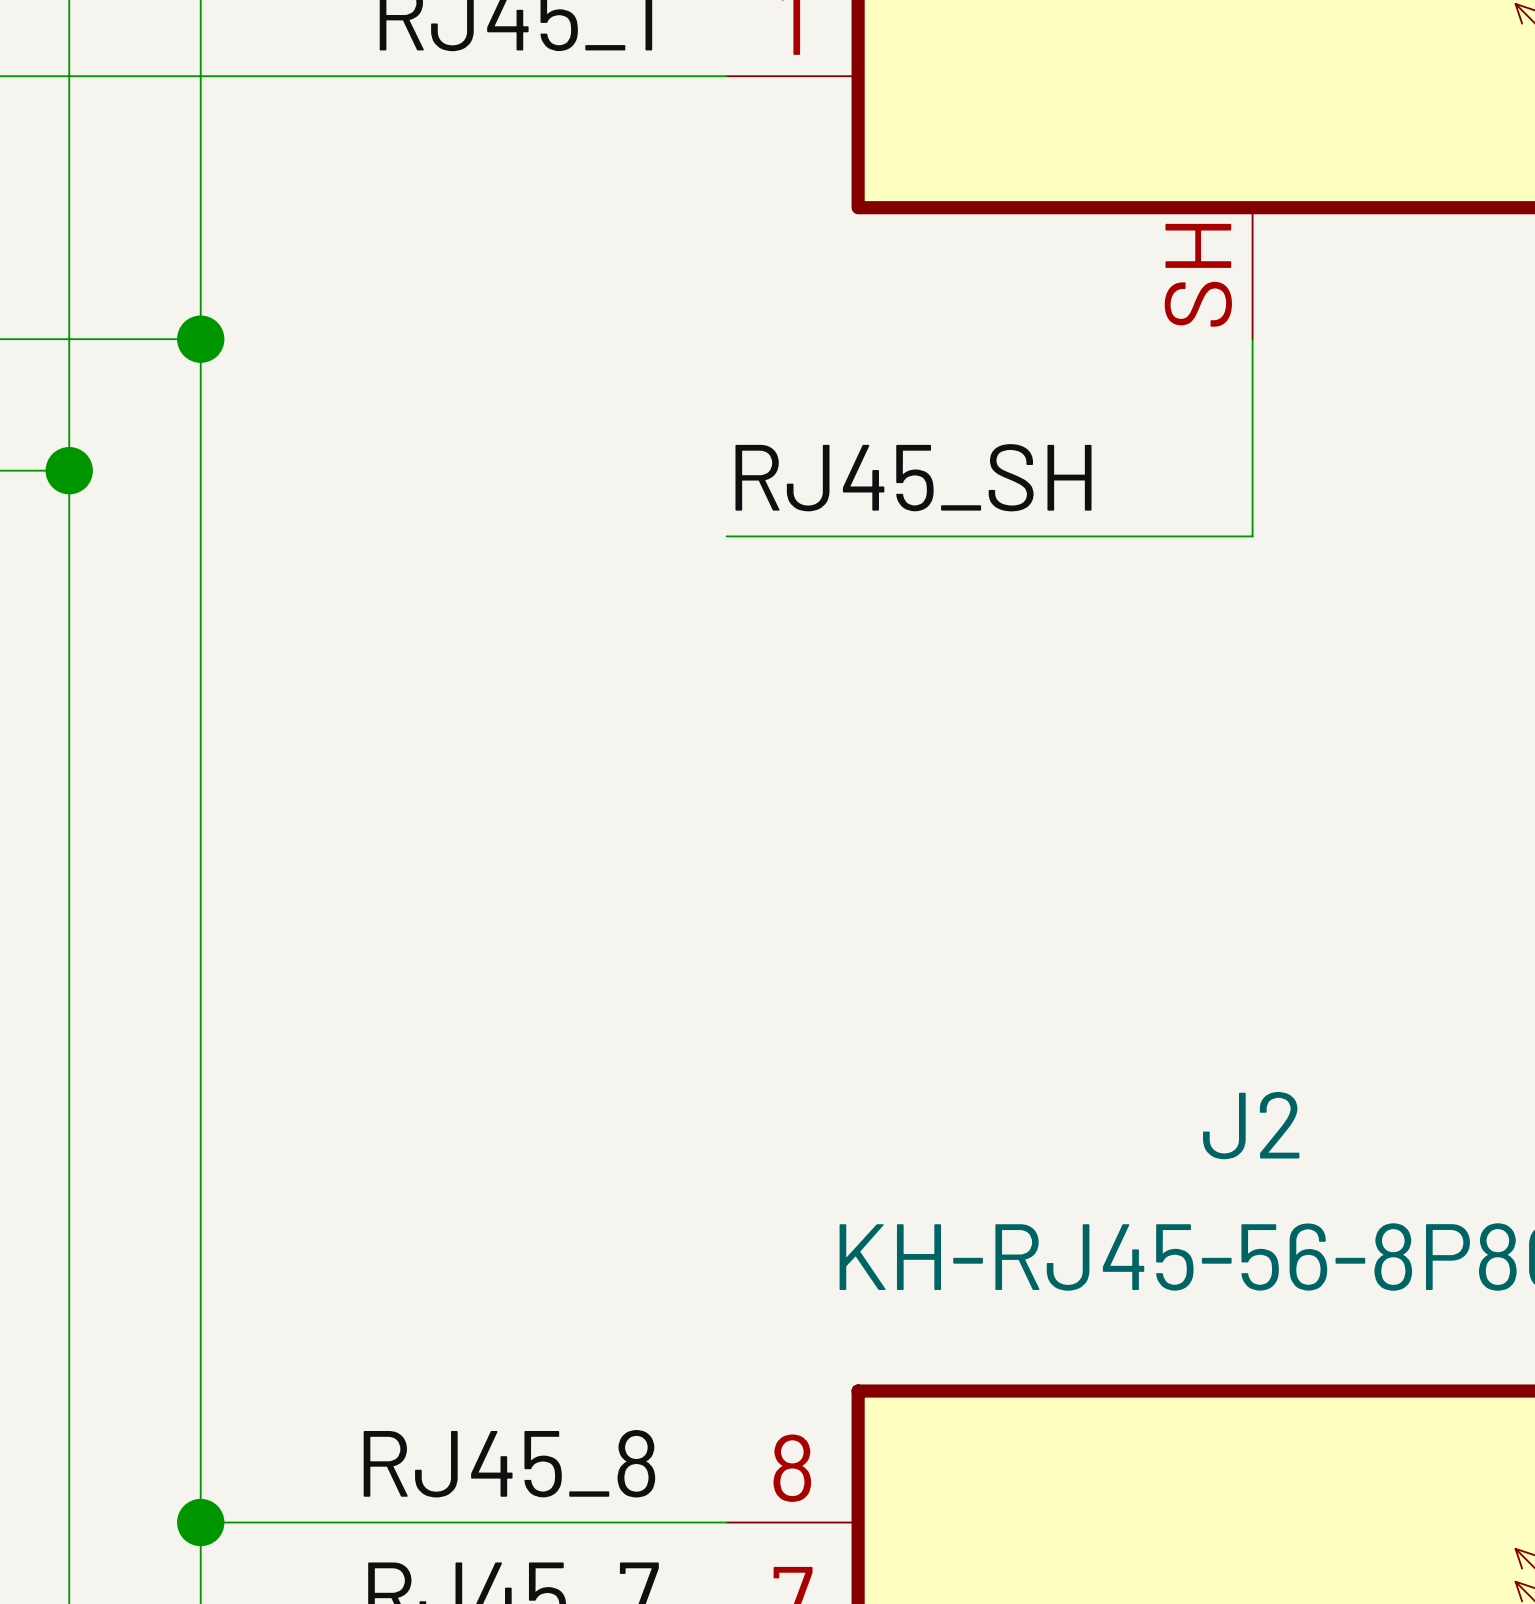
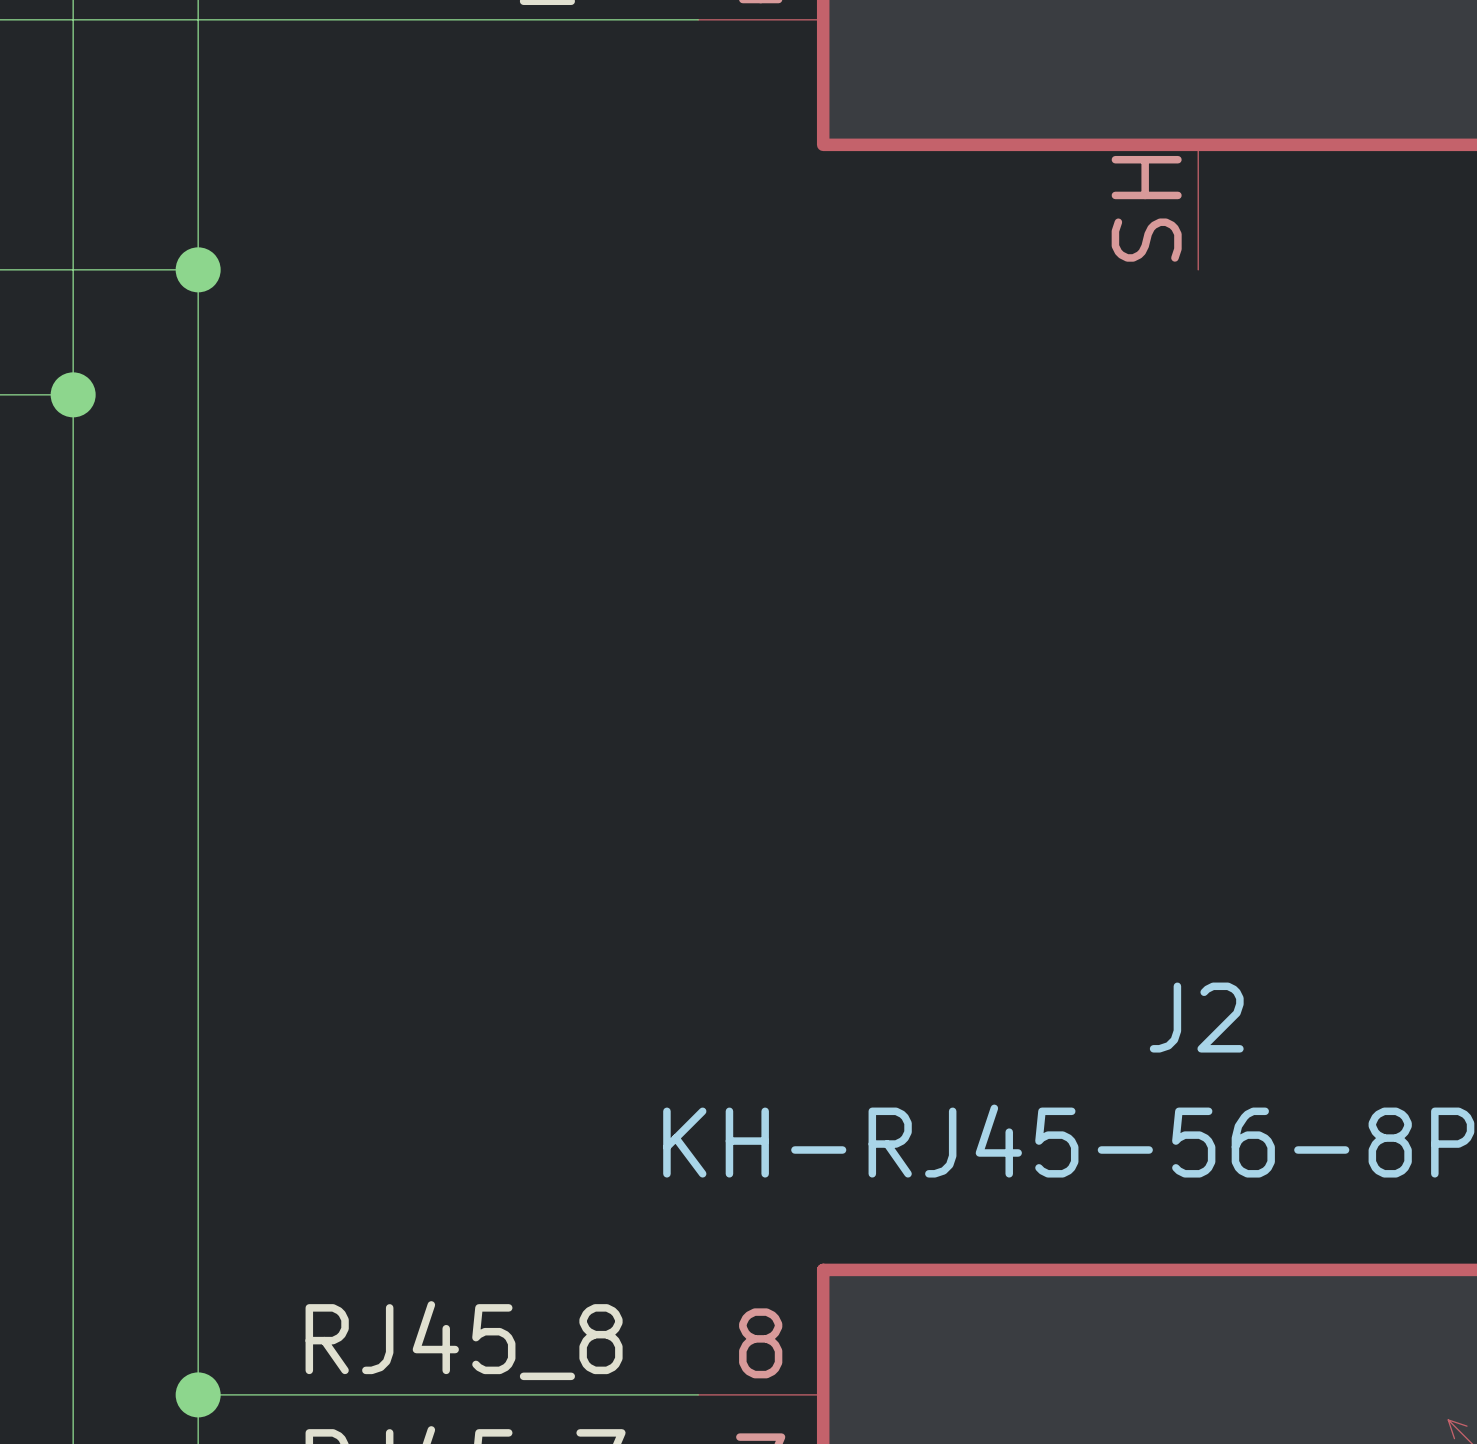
wire: (1252, 339) (1252, 536) (726, 536) -> none
label: RJ45_SH (913, 477) -> none

